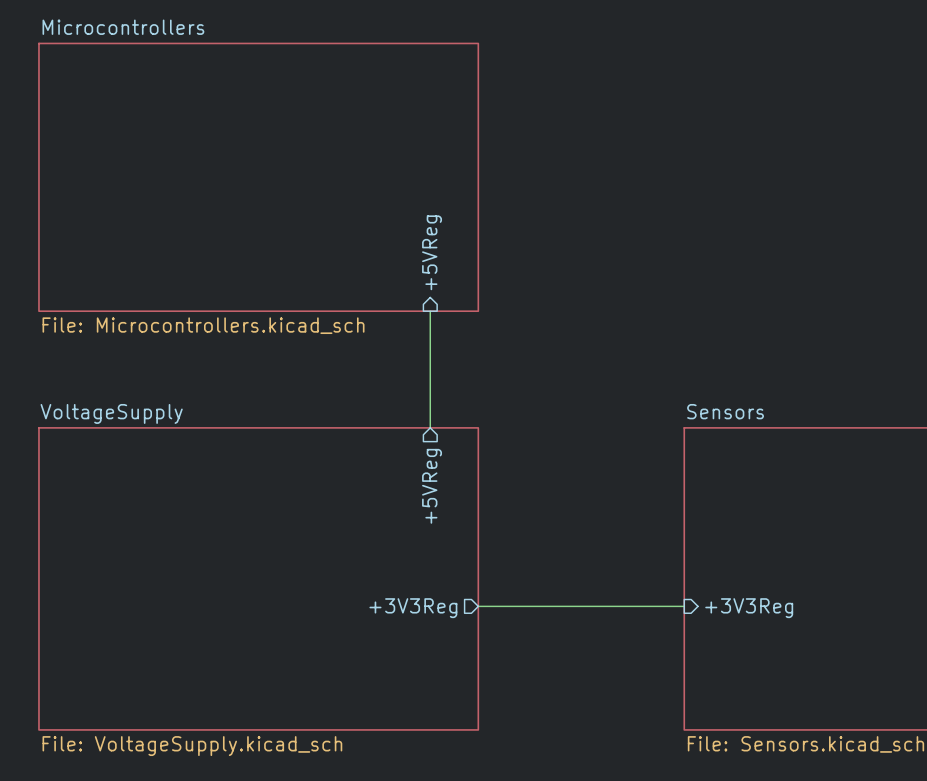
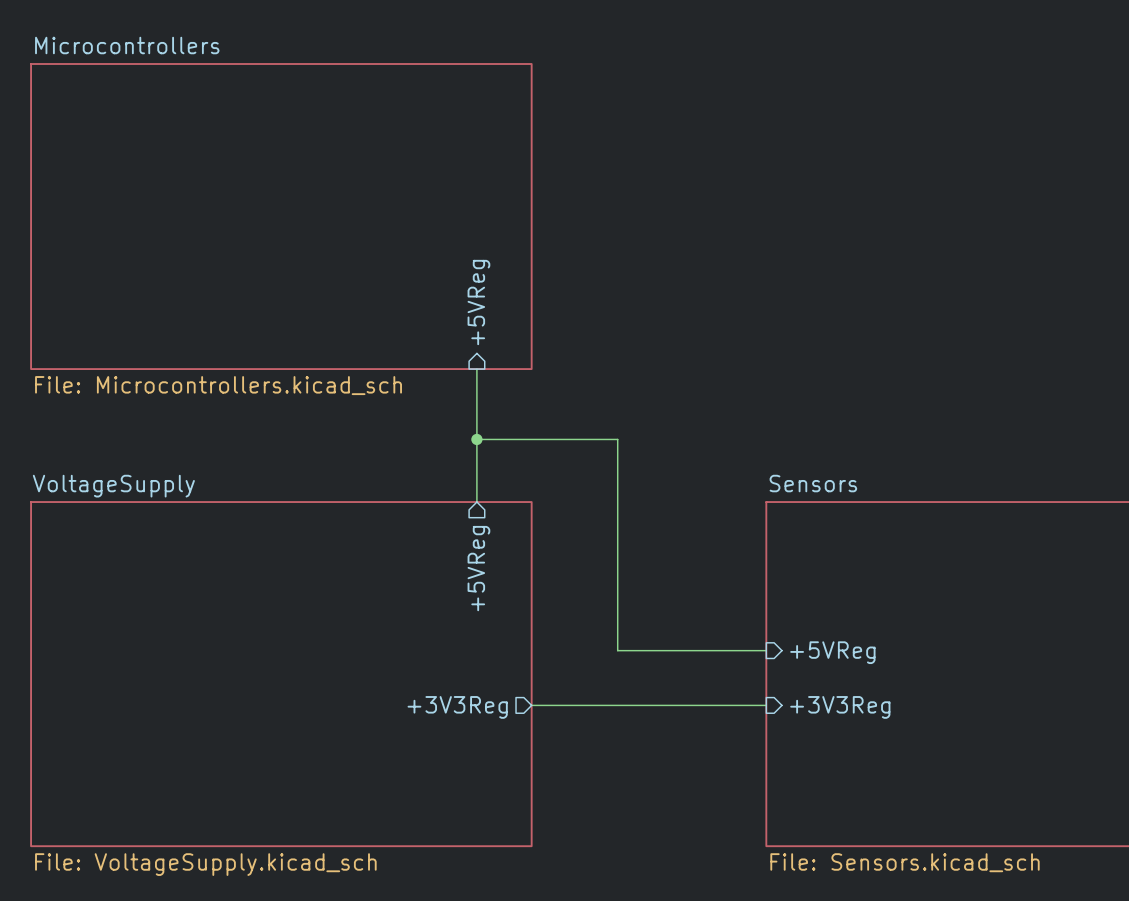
wire: none -> (476, 439) (617, 439) (617, 650) (766, 650)
junction: none -> (476, 439)
sheet pin: none -> +5VReg (832, 652)

